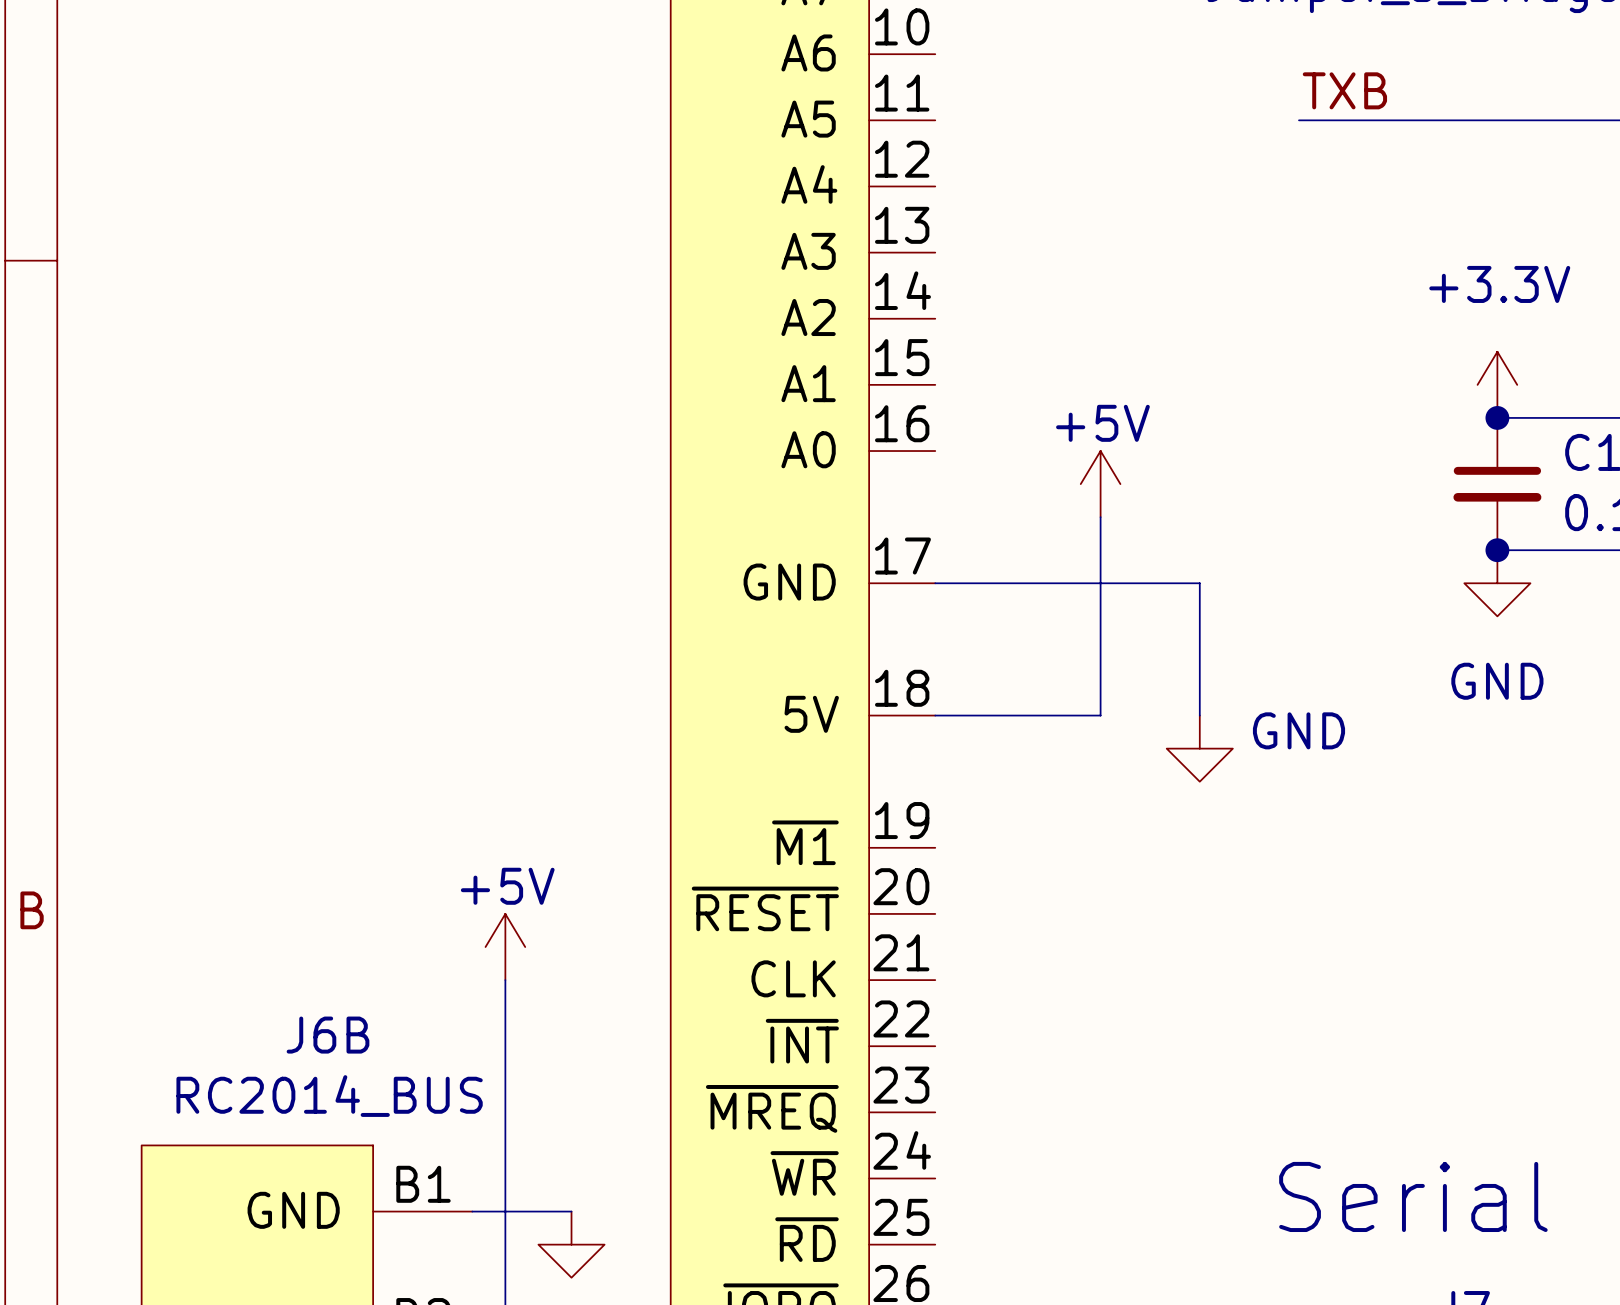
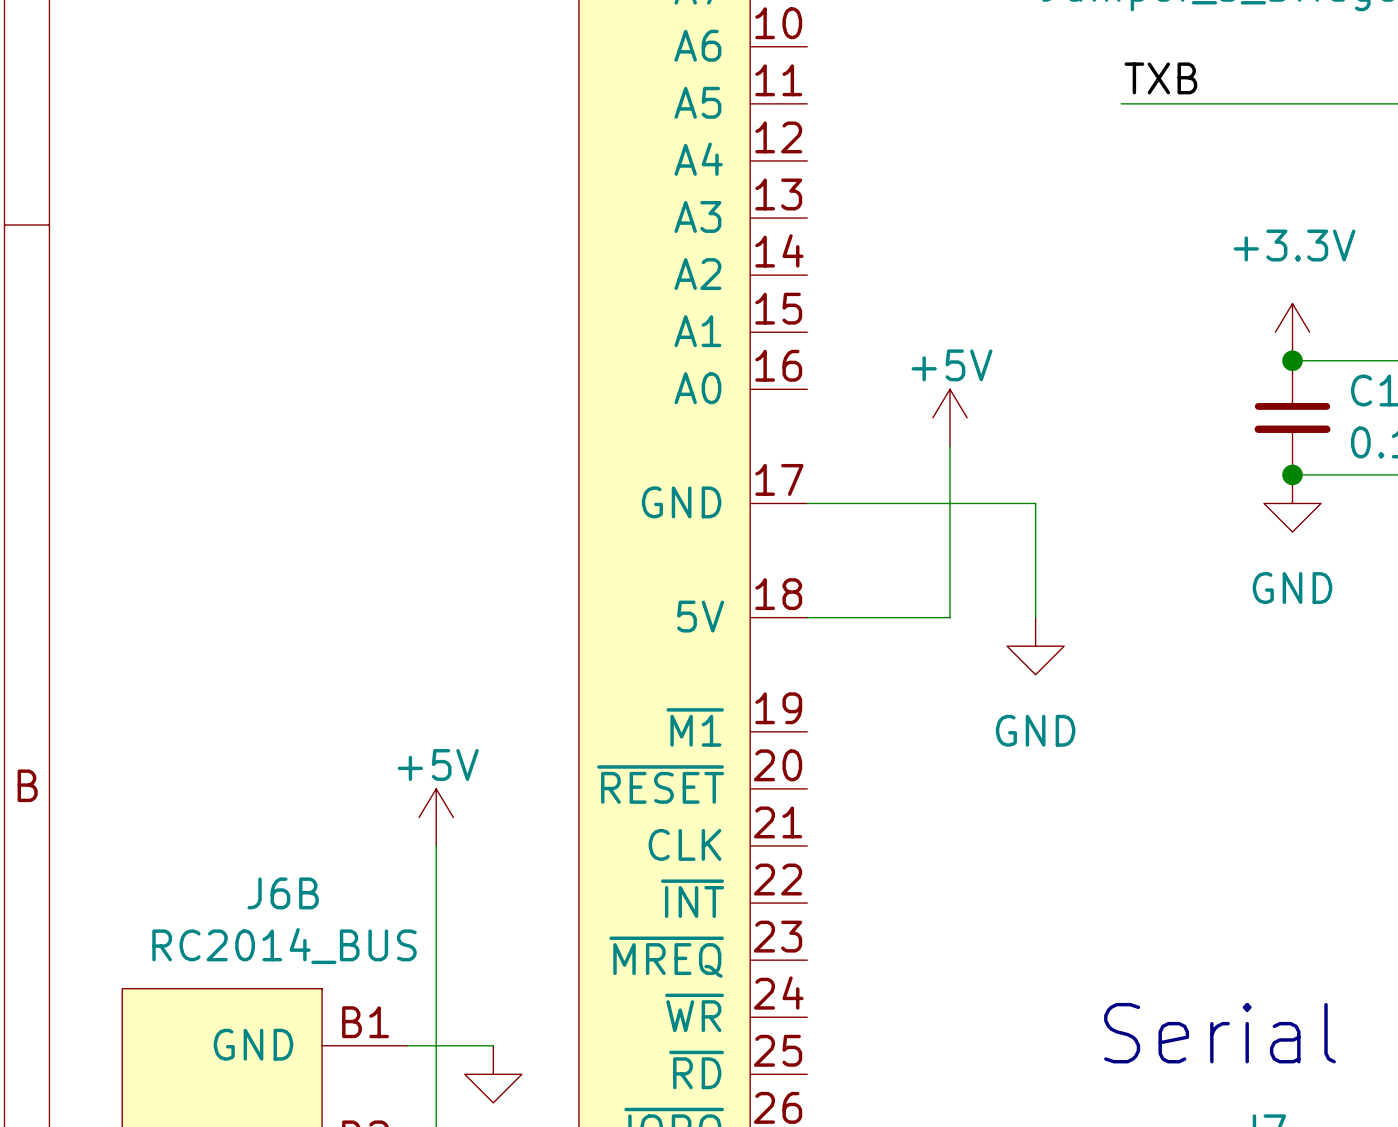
power symbol text position: GND (1298, 730) -> GND (1035, 730)

